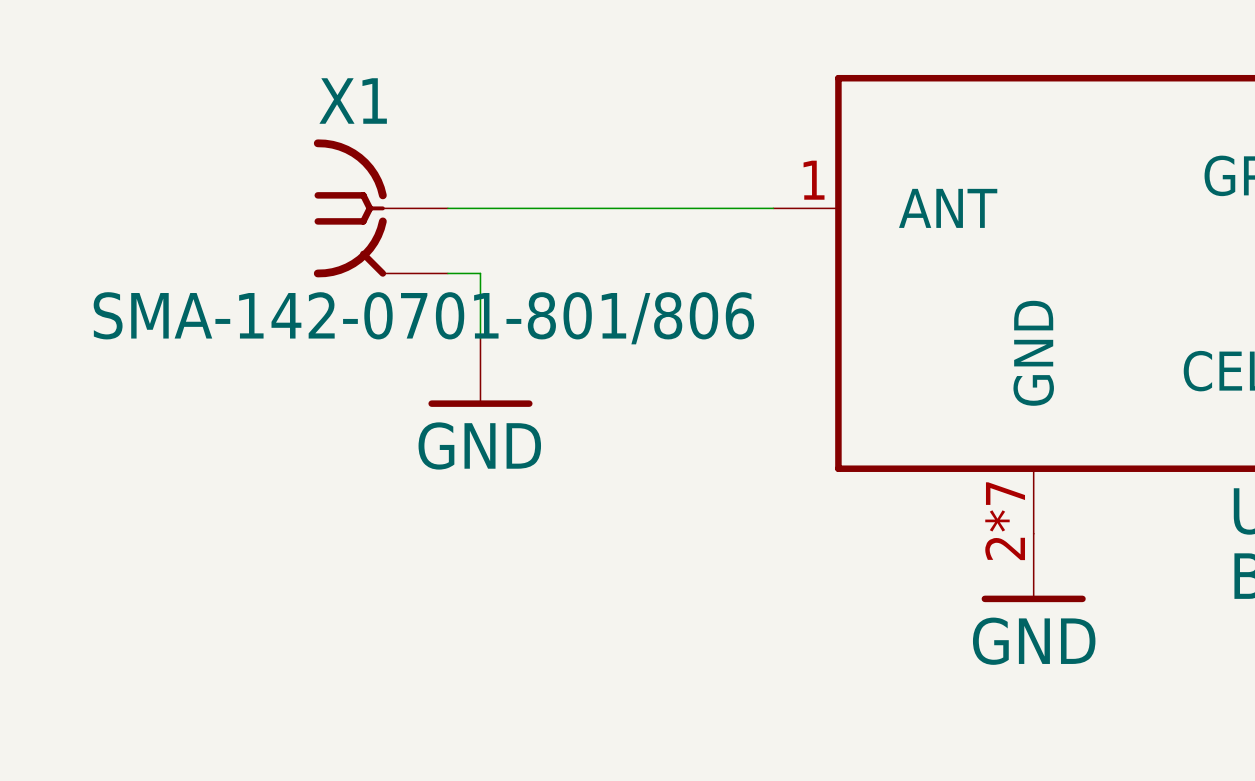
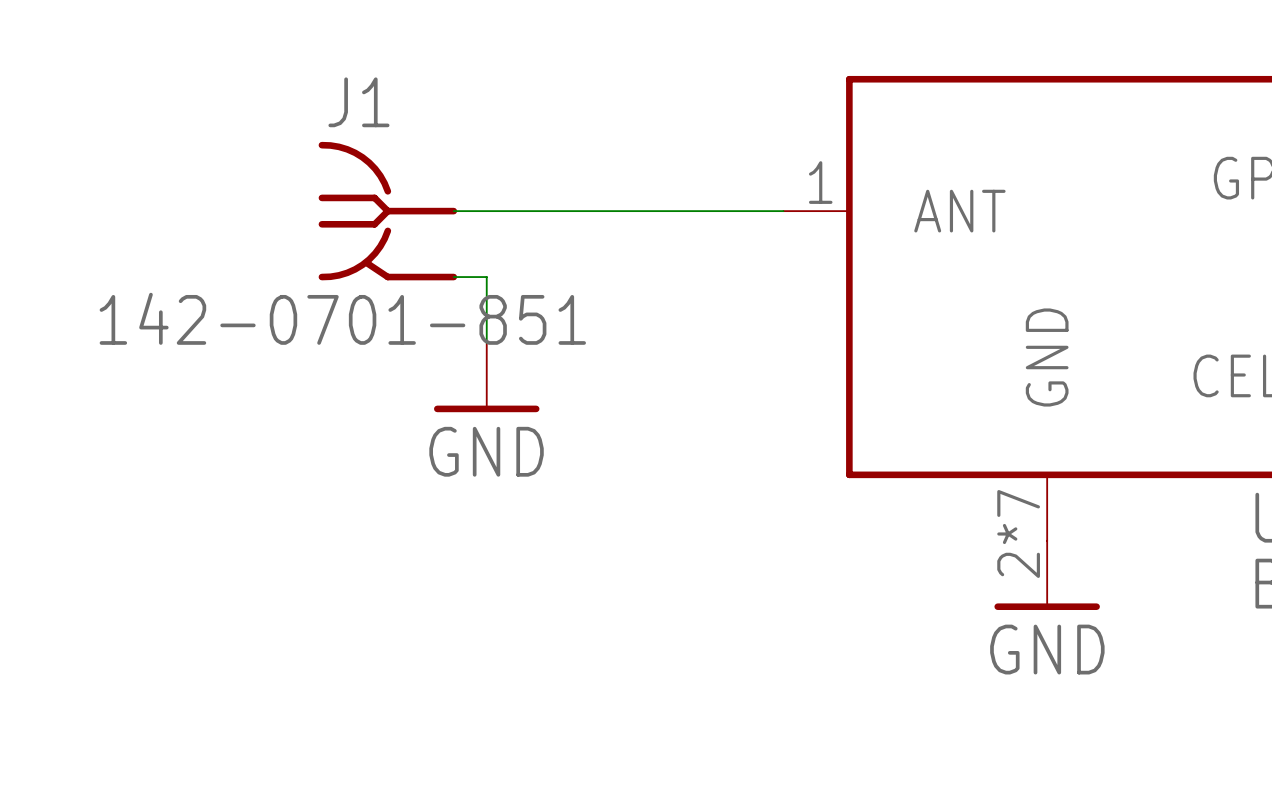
X1: SMA-142-0701-801/806 (380, 208) -> none
J1: none -> 142-0701-851 (387, 211)

